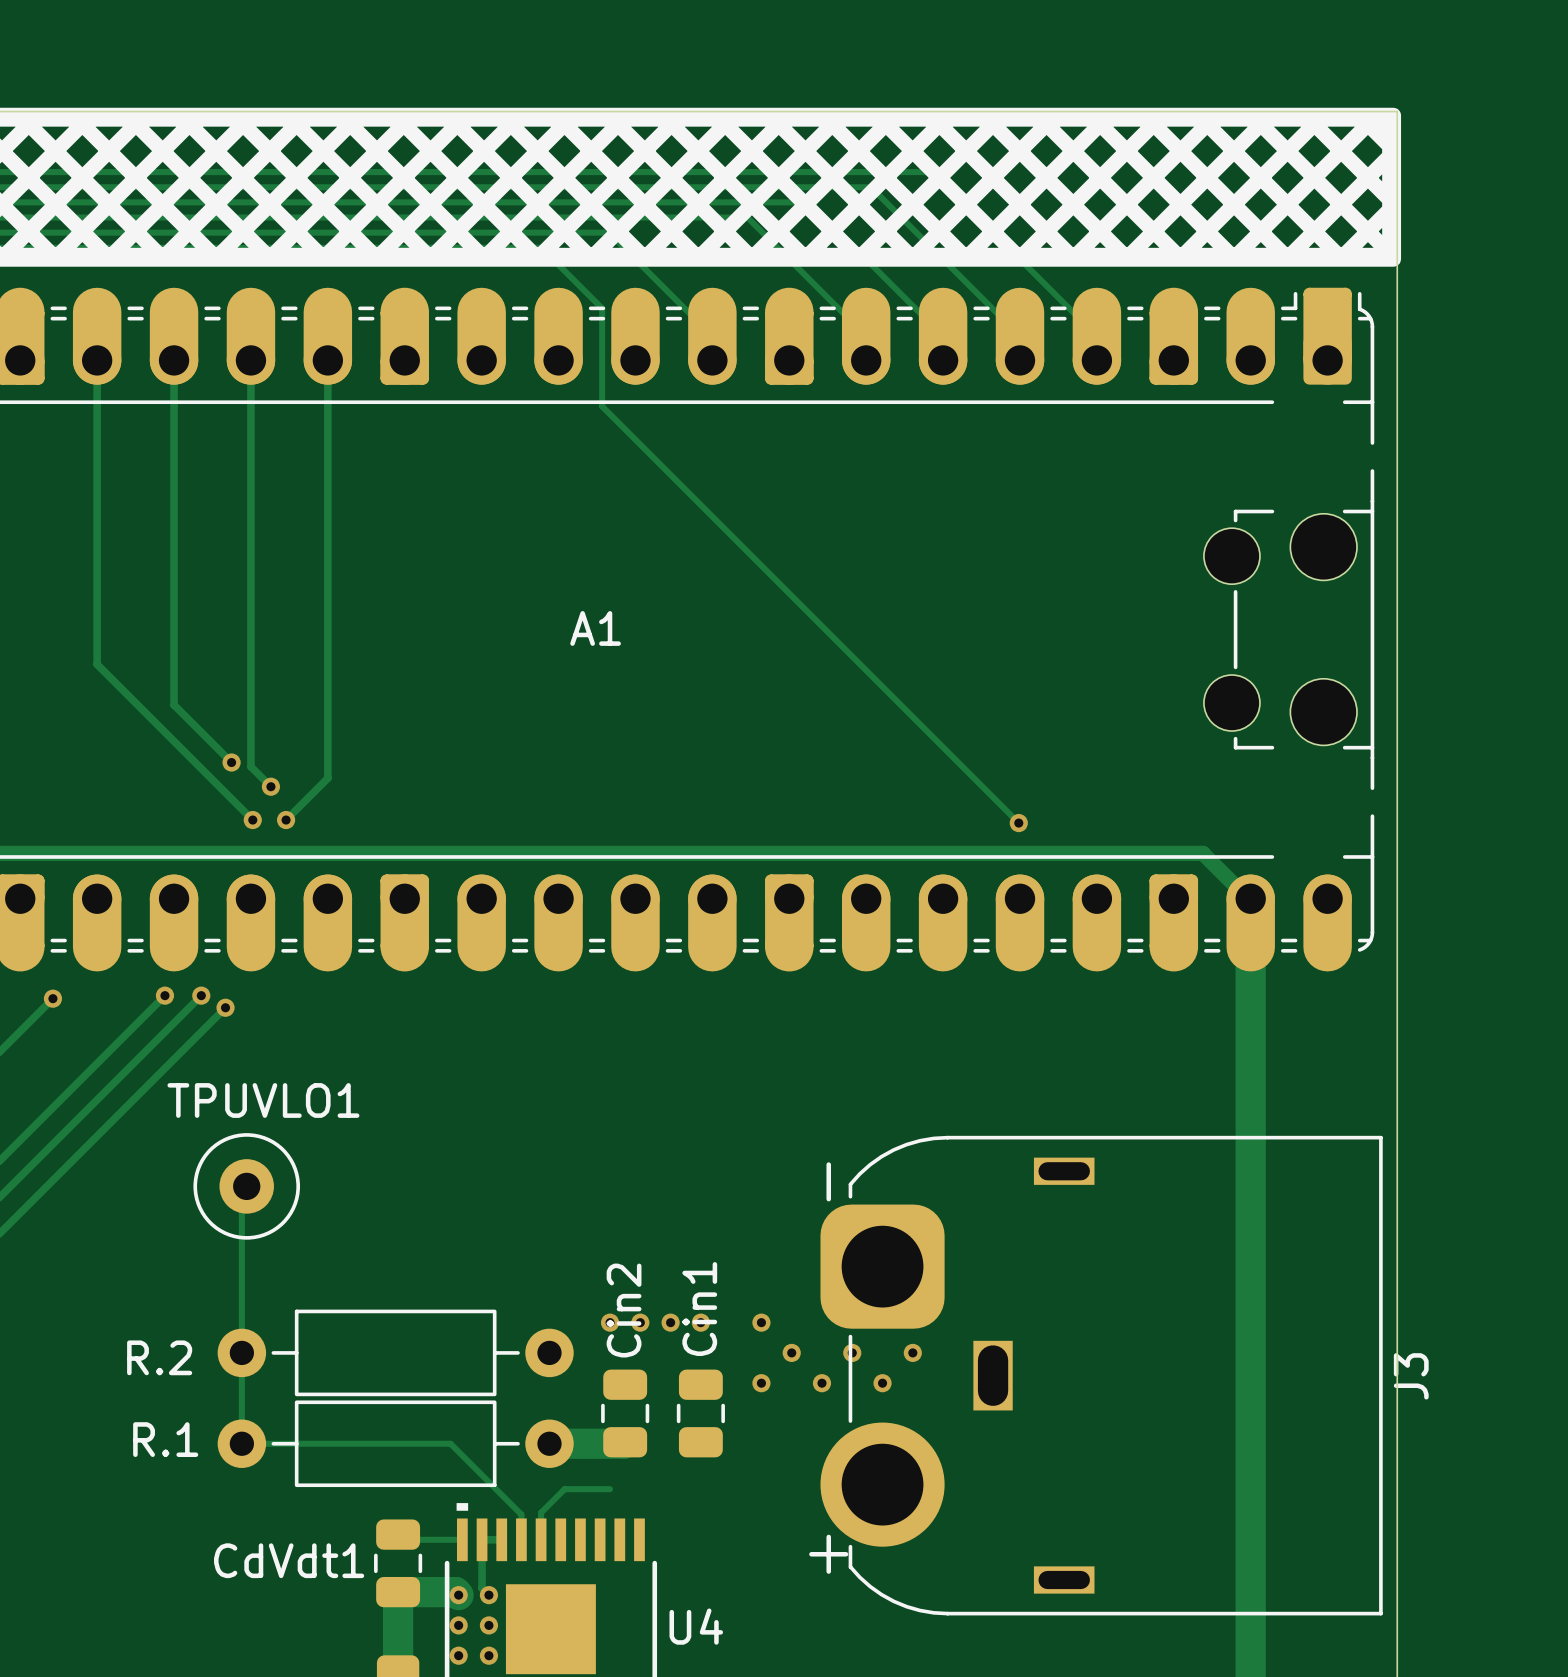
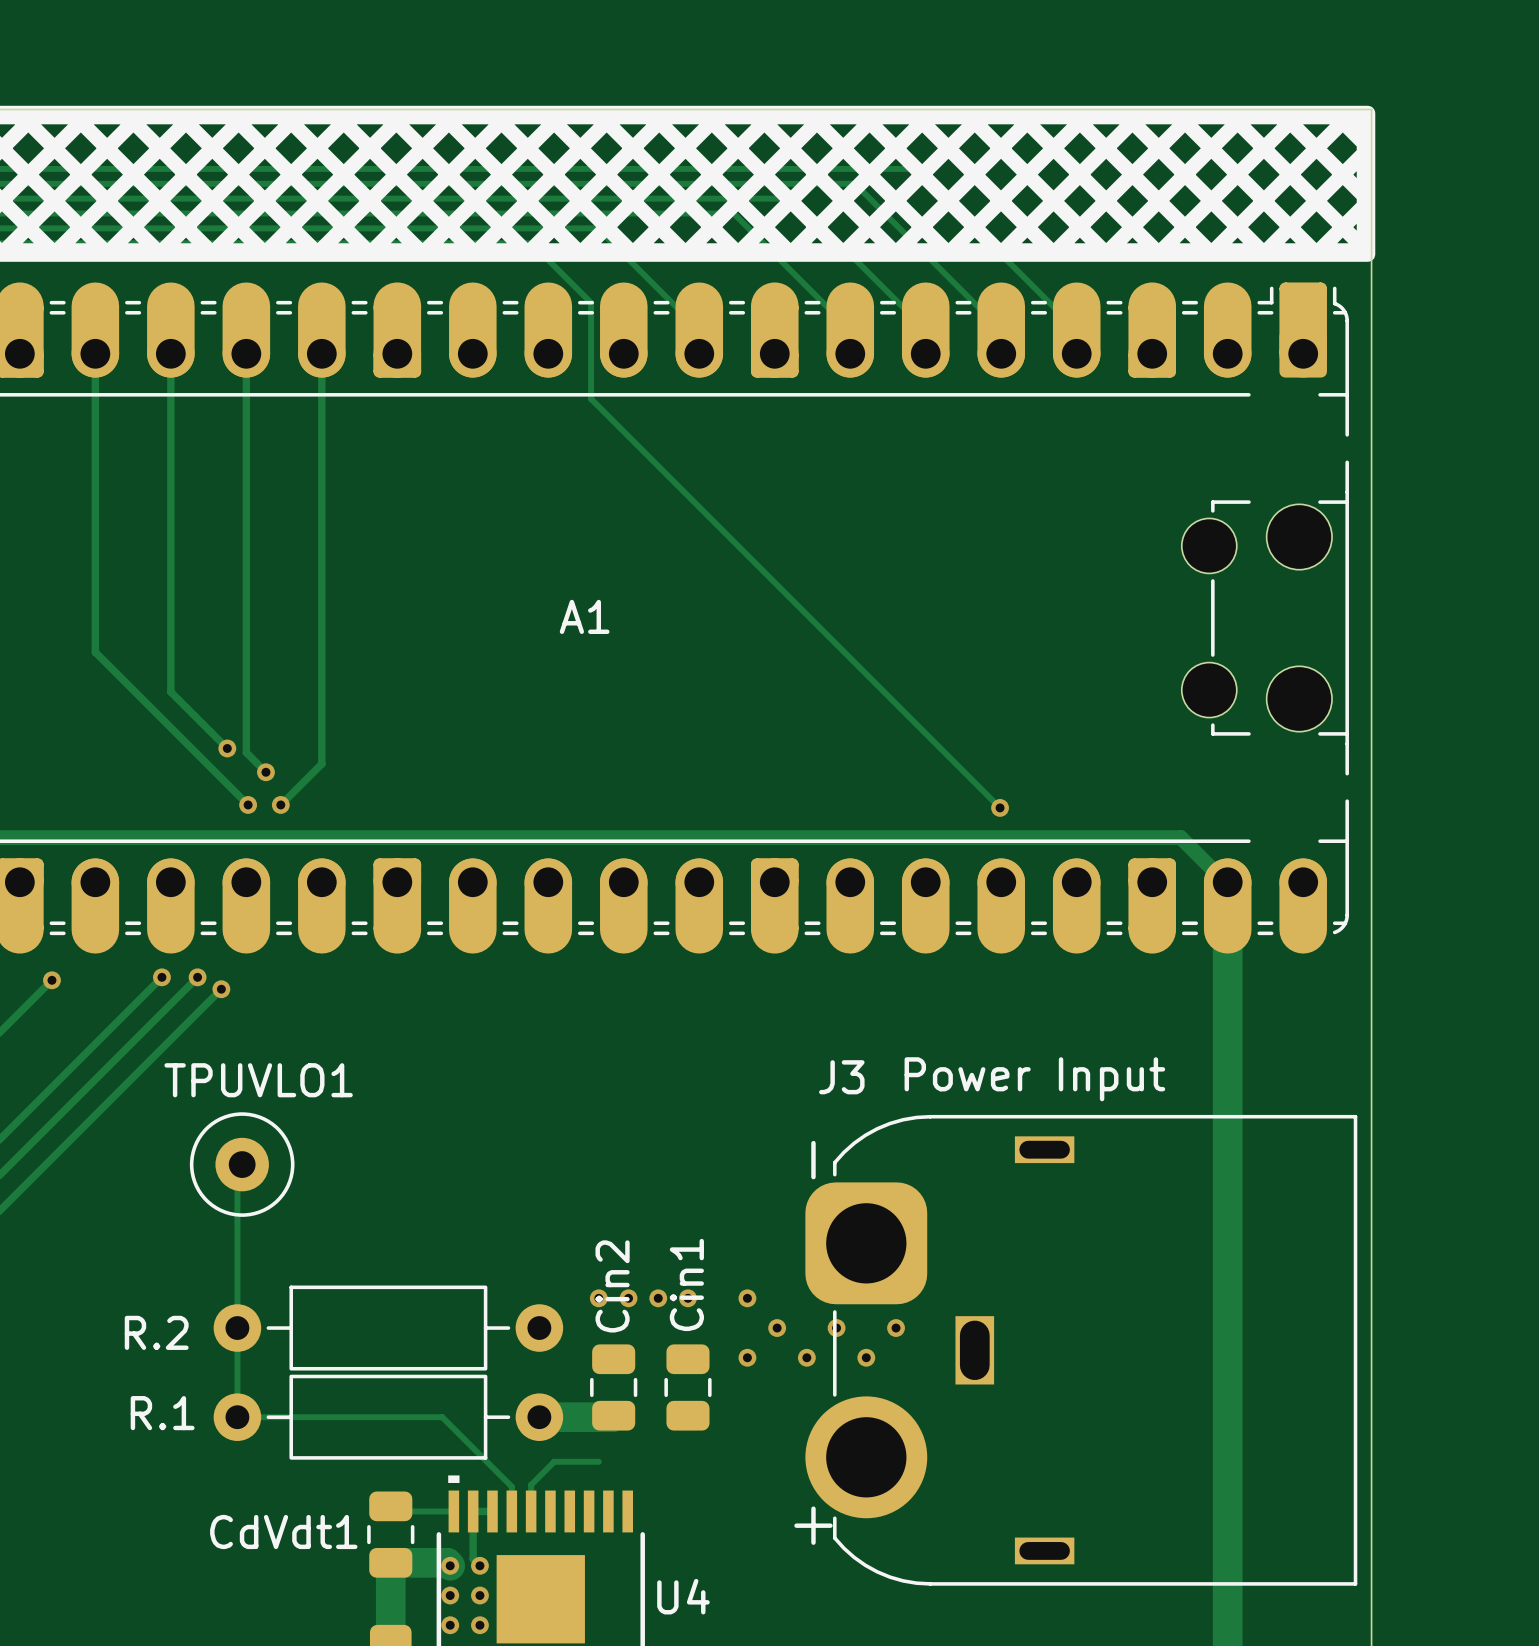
J3 value: none -> Power Input (1034, 1079)
J3 name rotation: 0° (1411, 1376) -> 90° clockwise (841, 1077)
J3 name position: J3 (1411, 1376) -> J3 (841, 1077)

